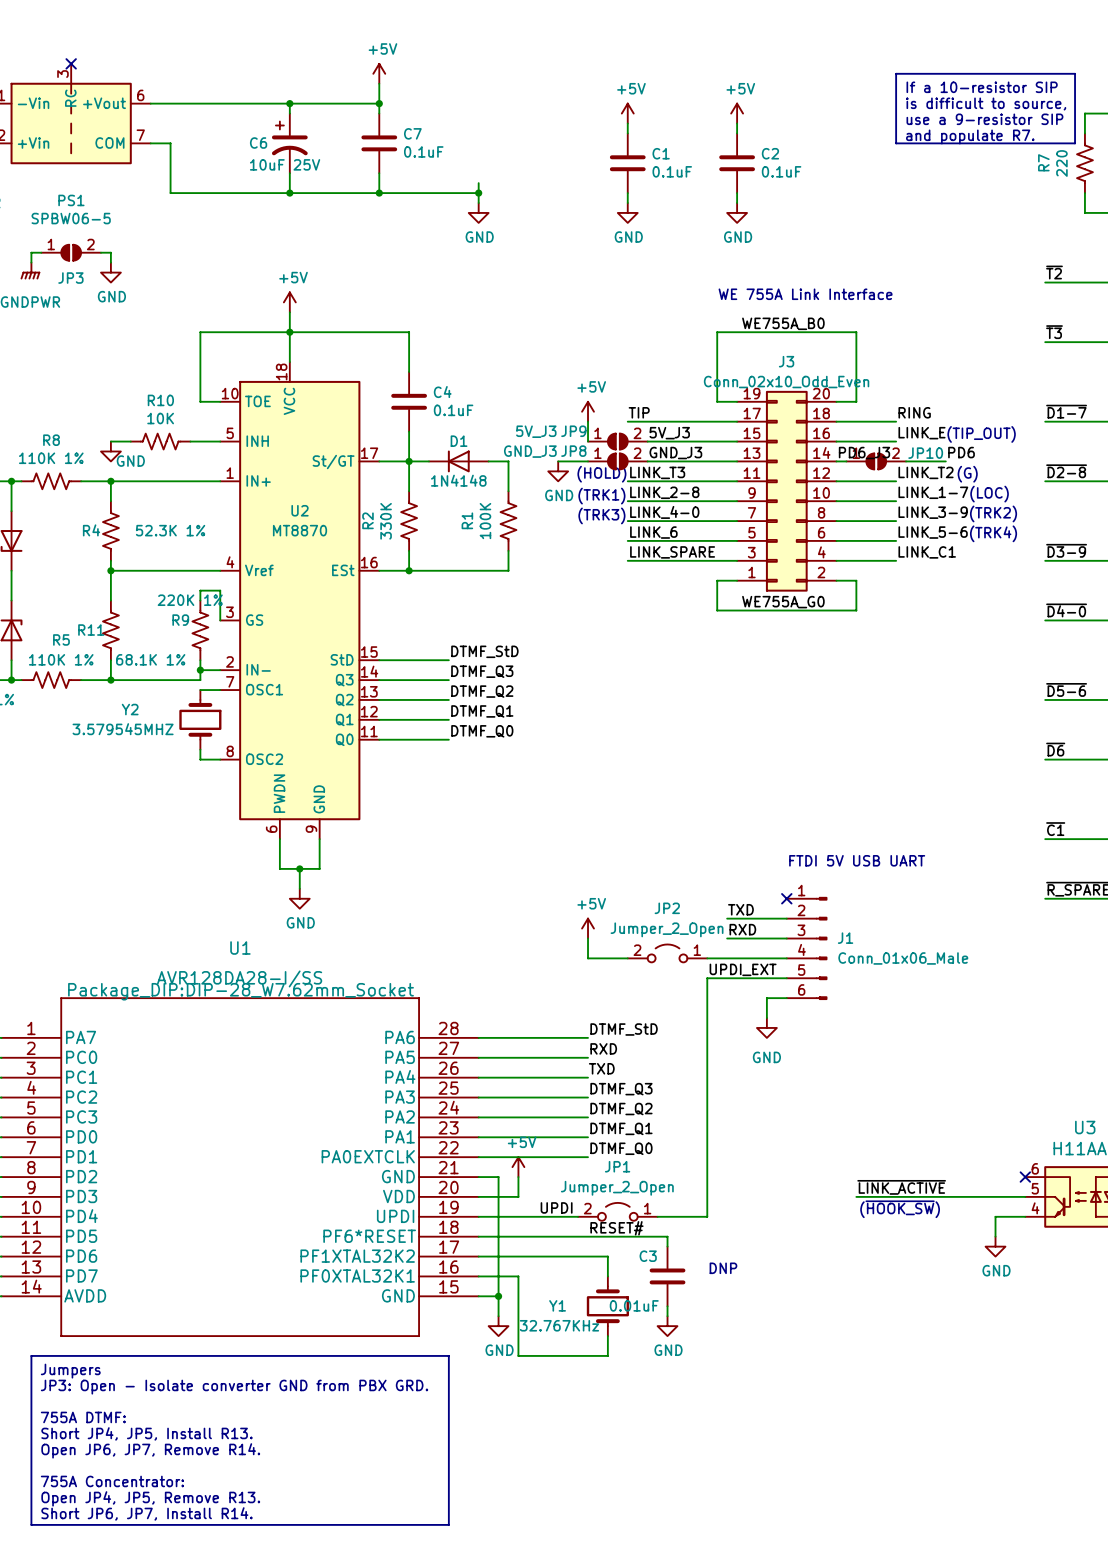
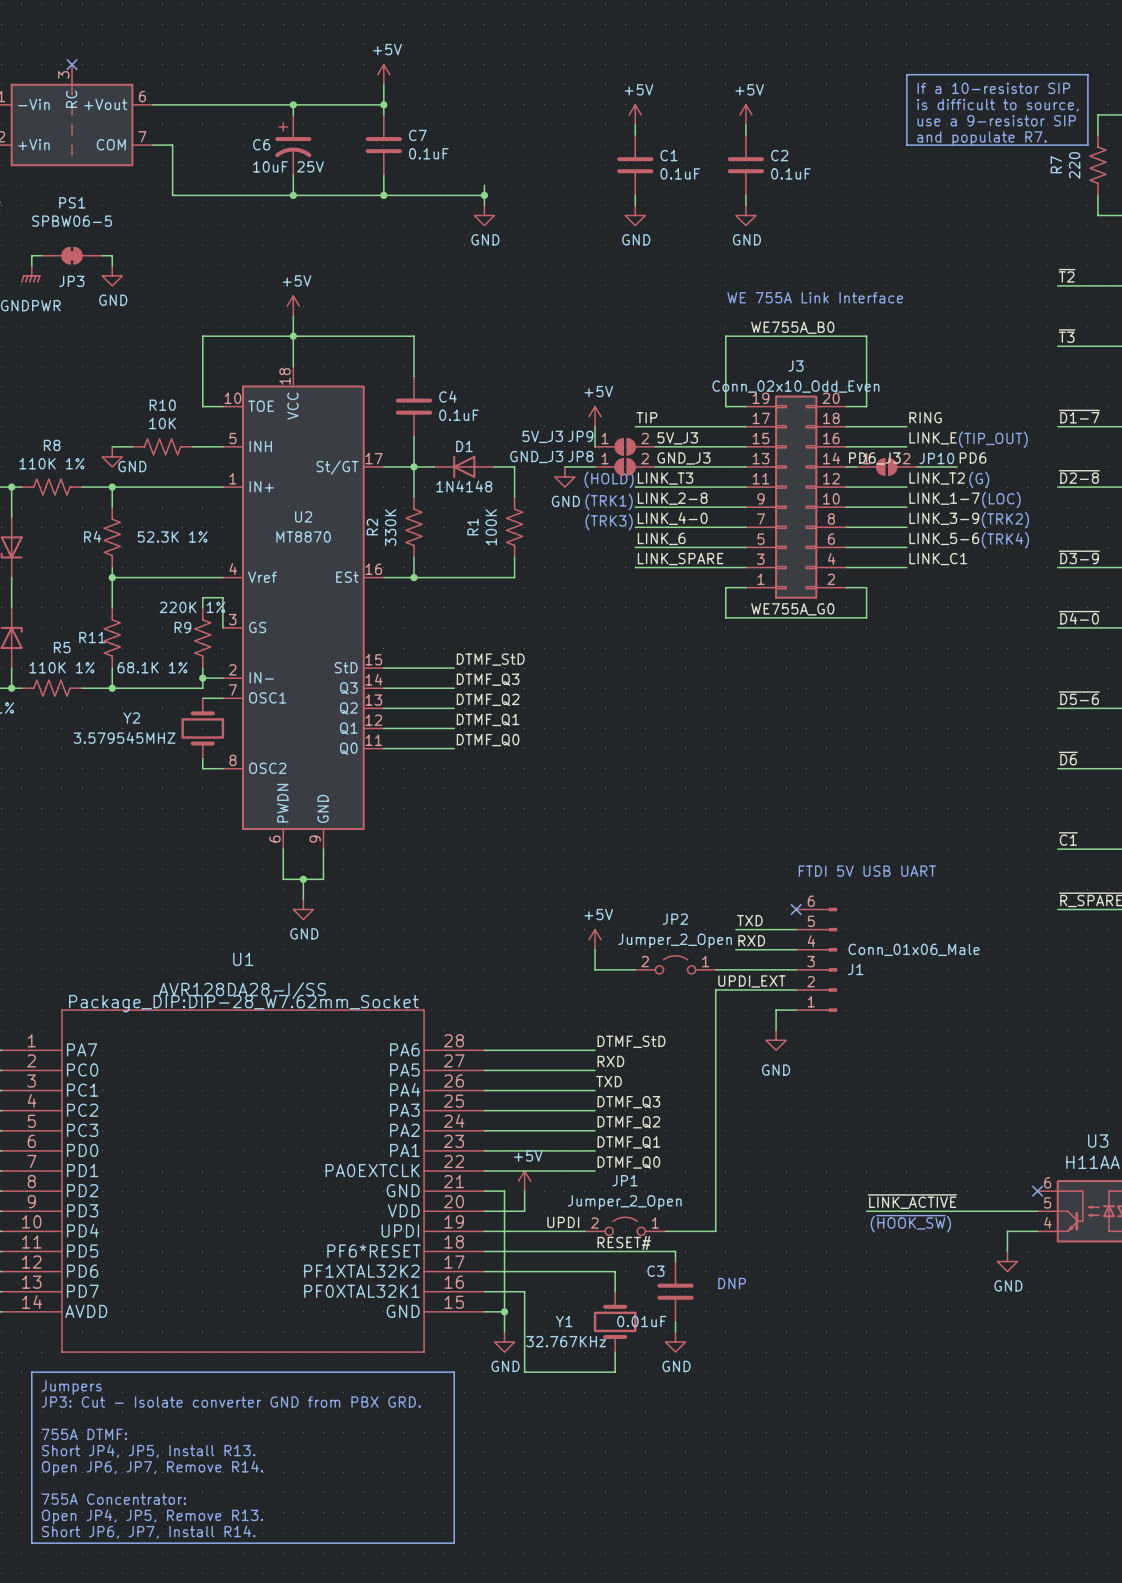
JP3 symbol: [41, 244, 101, 261] -> [41, 247, 103, 264]
J1 flip: as is (821, 948) -> up-down (831, 959)
text: JP3: Open - Isolate converter GND from PBX GRD. (234, 1387) -> JP3: Cut - Isolate converter GND from PBX GRD. (231, 1402)

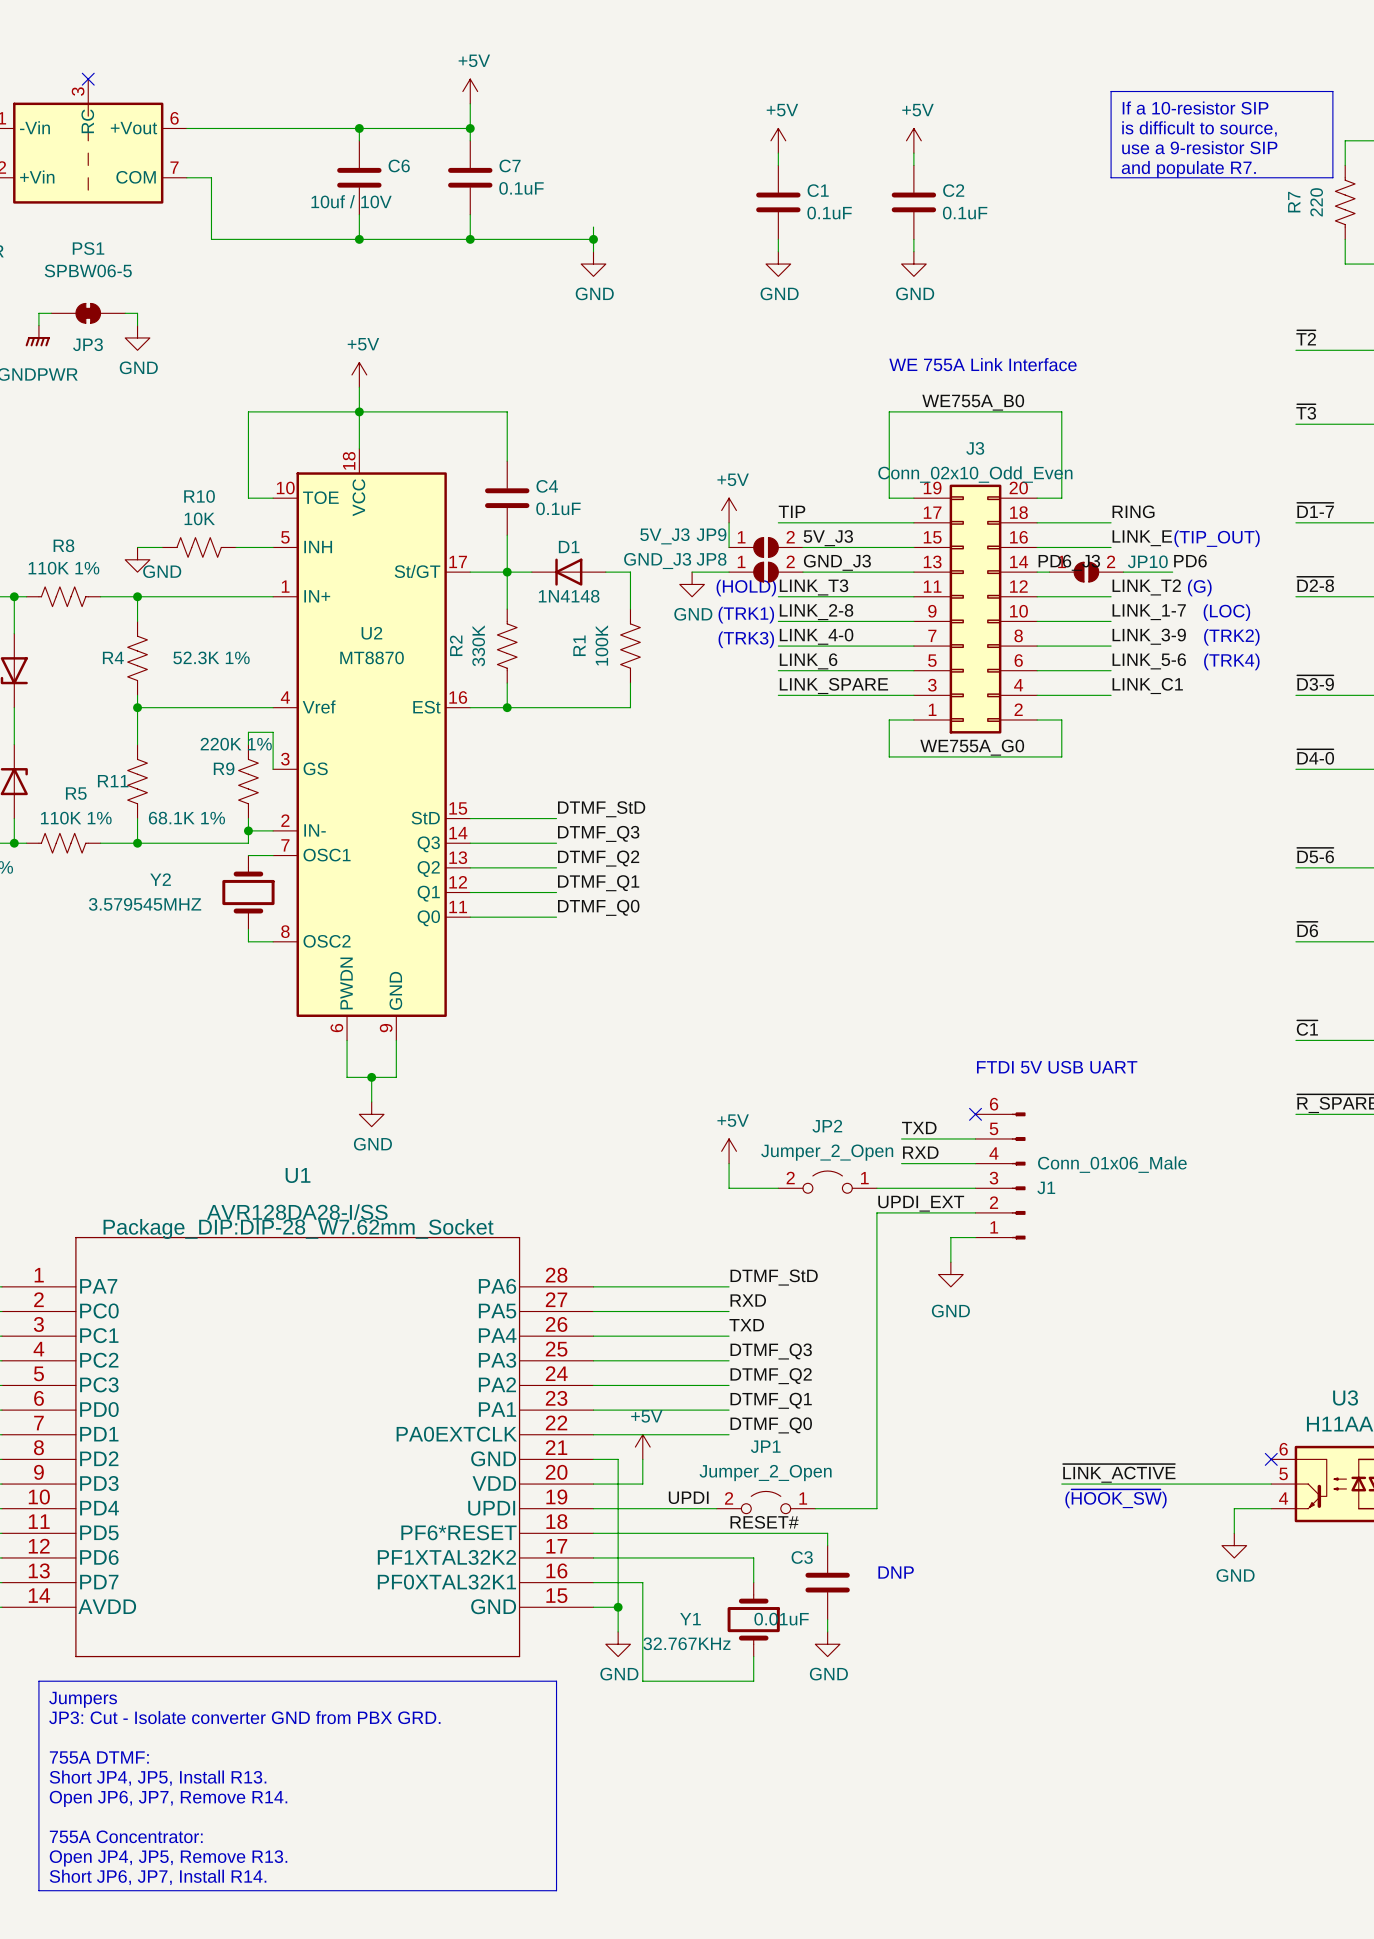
C6 symbol: [275, 114, 312, 176] -> [337, 140, 382, 215]
C6 name position: C6 (261, 144) -> C6 (399, 165)
C6 value: 10uF 25V (288, 166) -> 10uf / 10V (351, 201)

